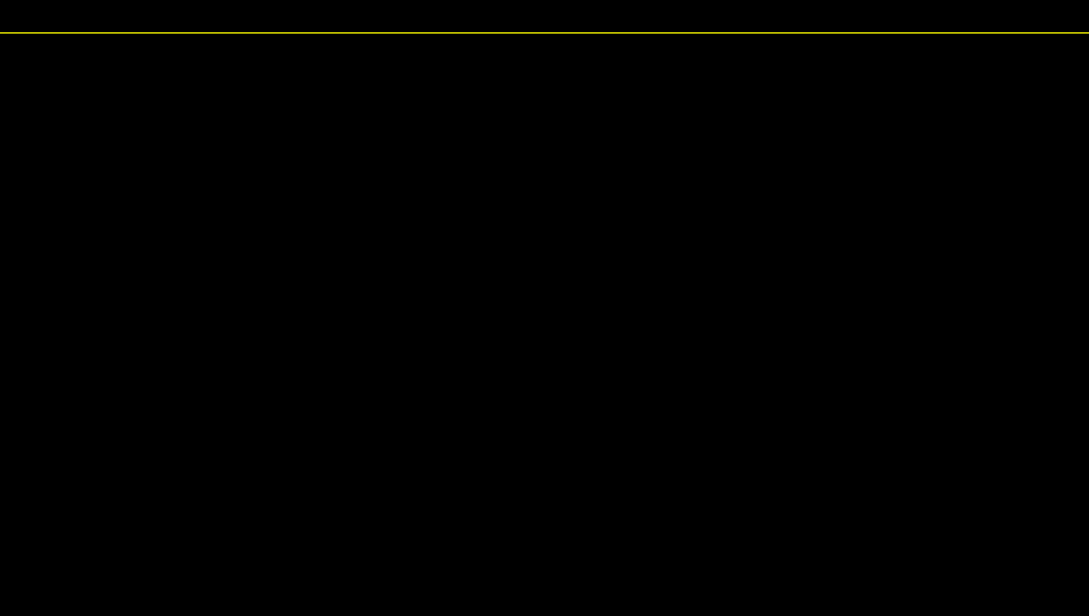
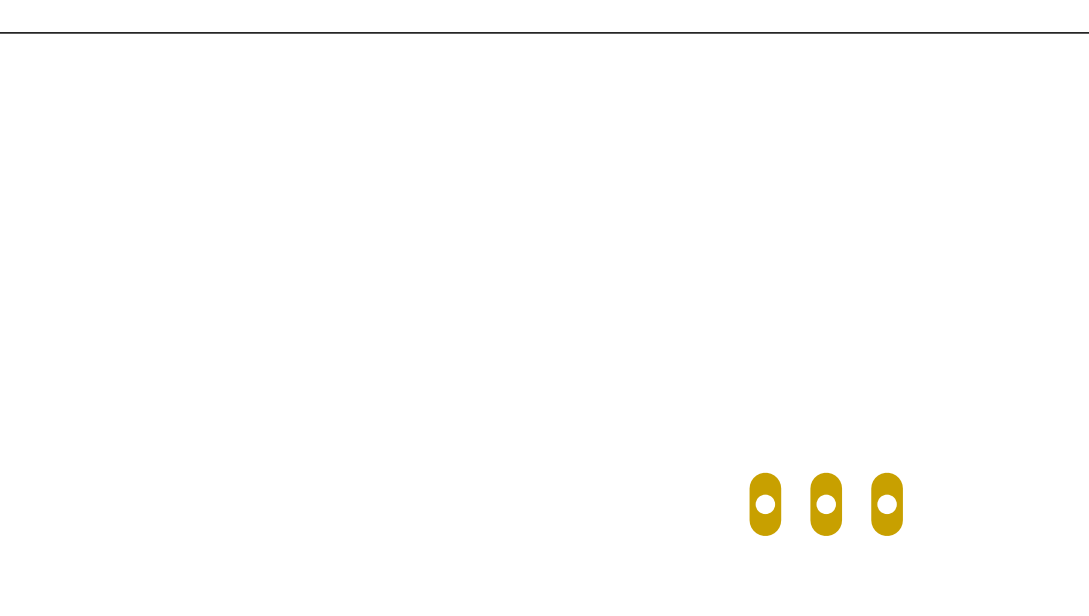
part: none -> (826, 504)

